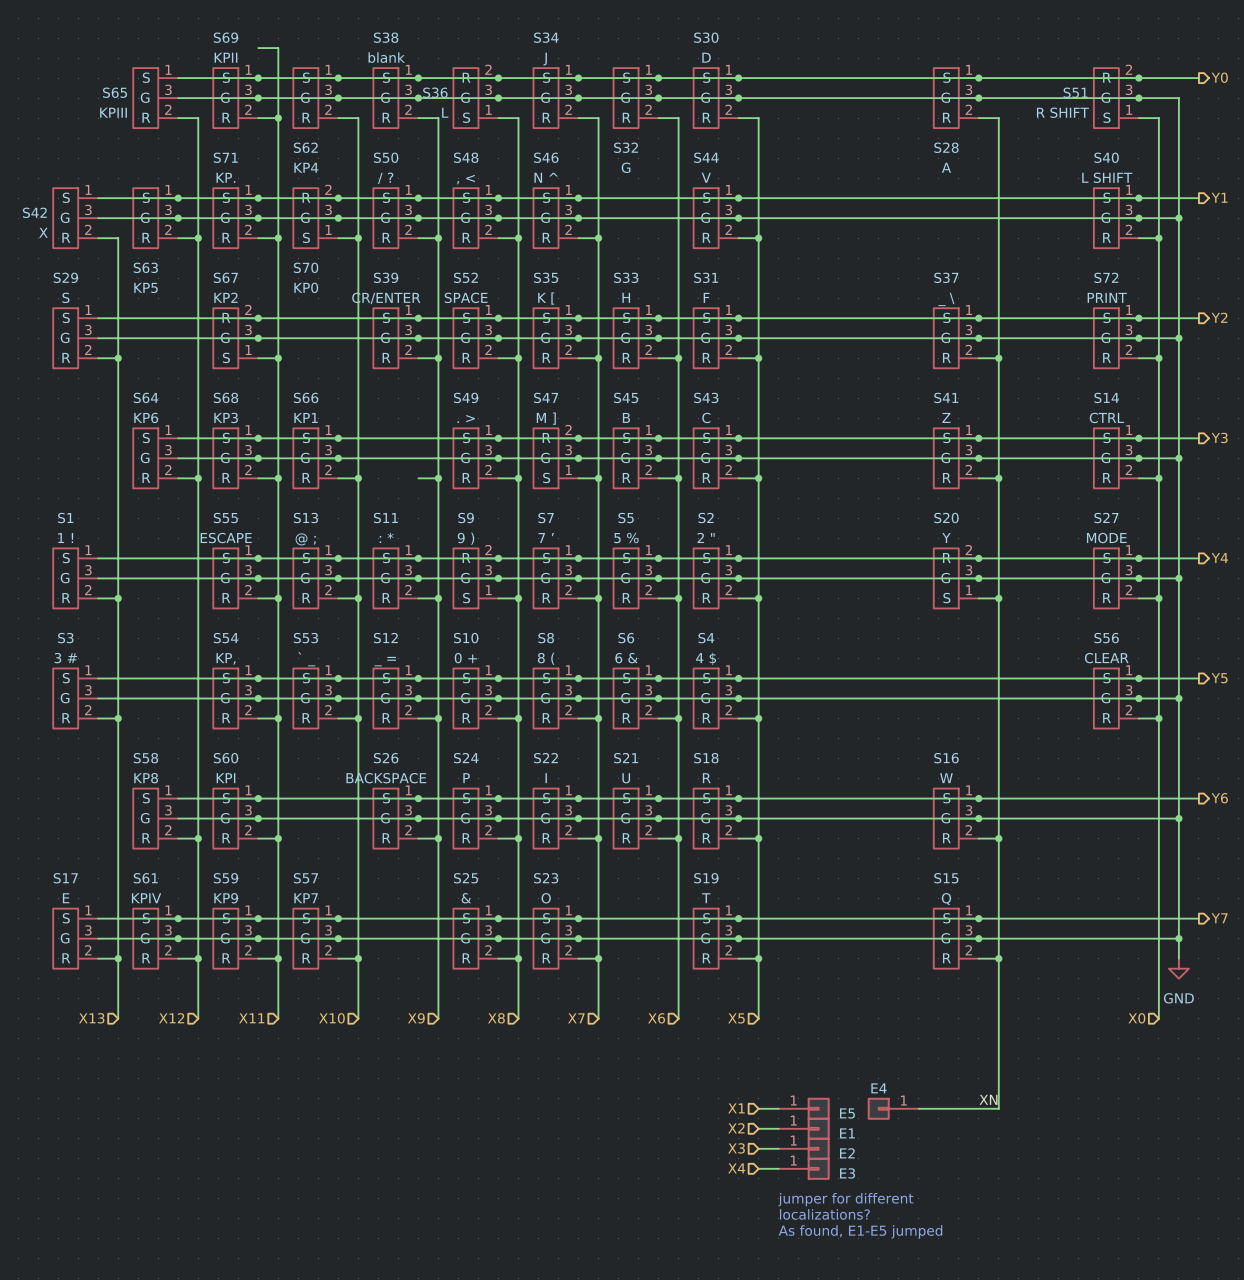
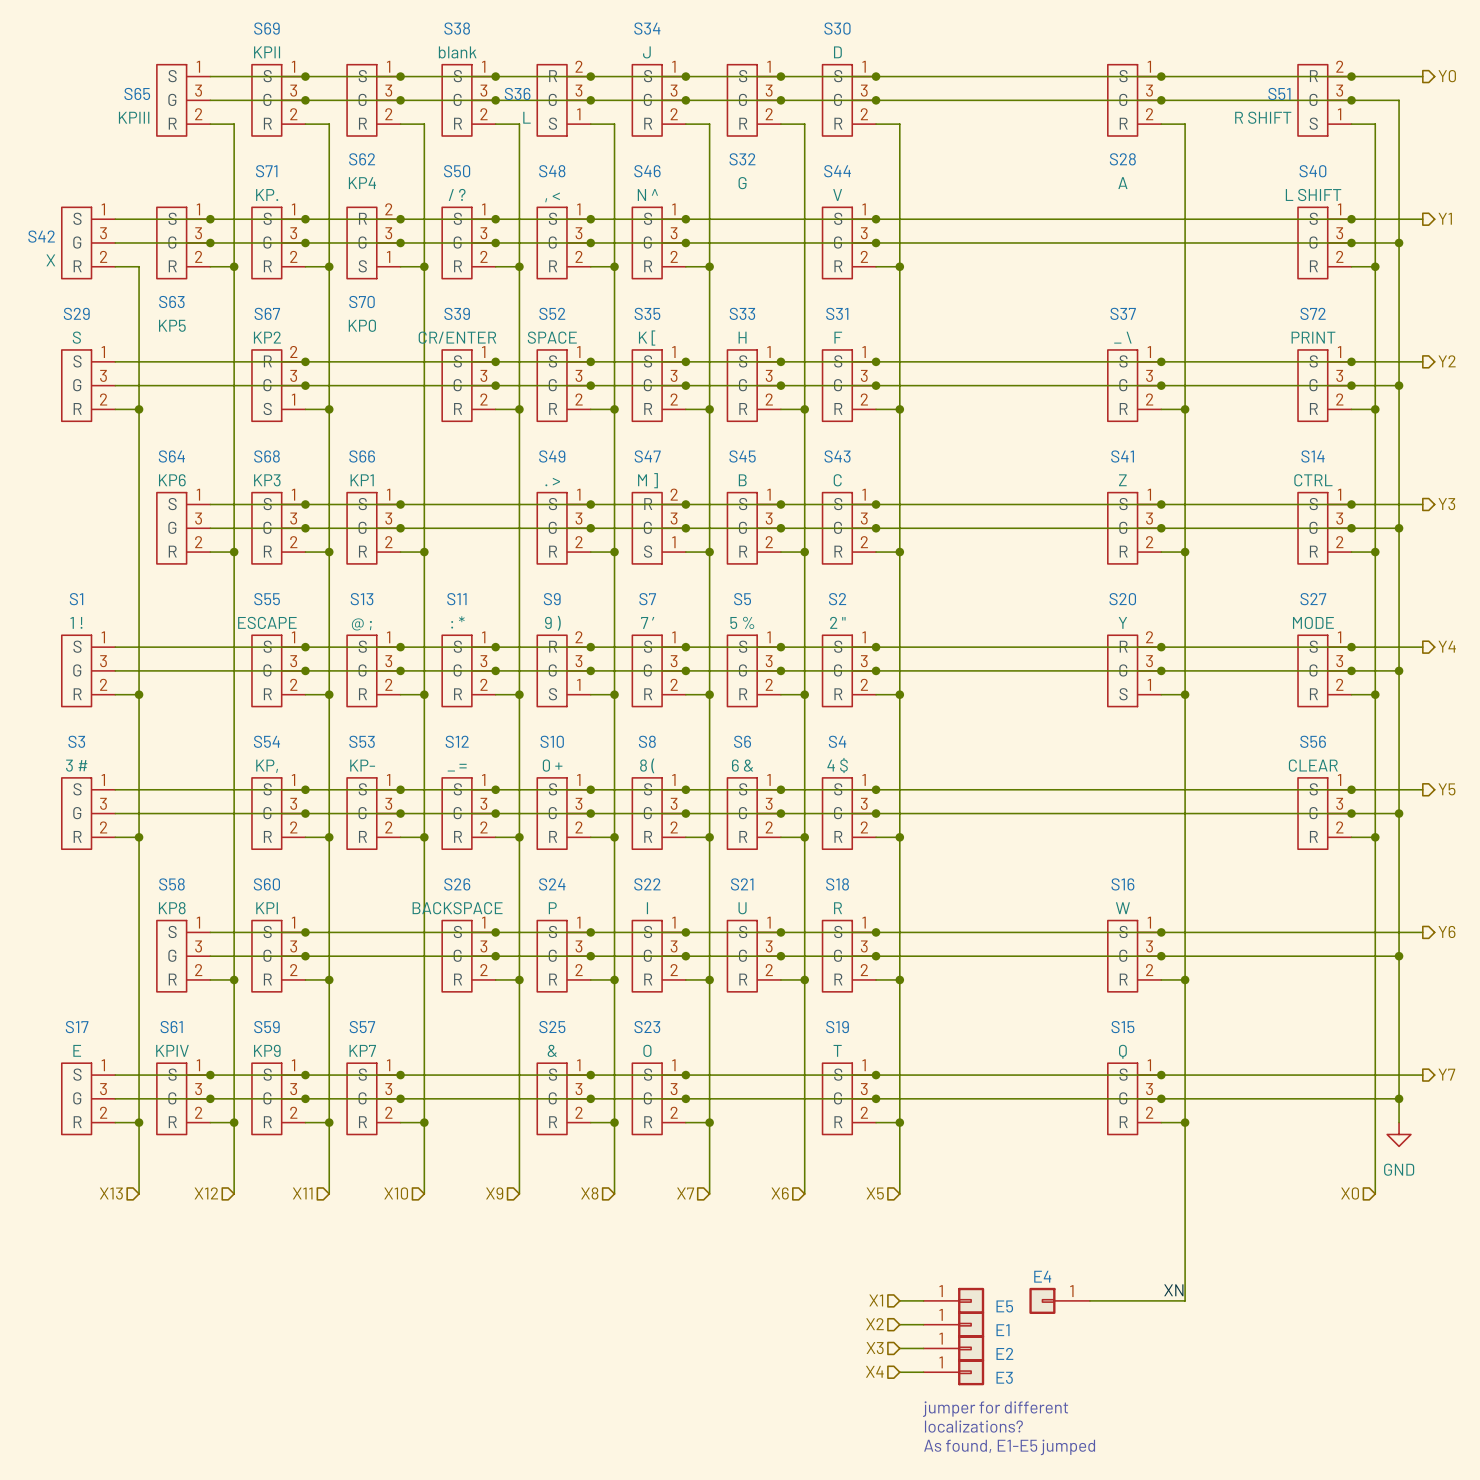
wire: (258, 48) (278, 48) (278, 118) -> none
junction: (278, 118) -> none
wire: (418, 478) (438, 478) -> none
junction: (438, 478) -> none
S53 value: ` _ (306, 659) -> KP- (362, 765)

